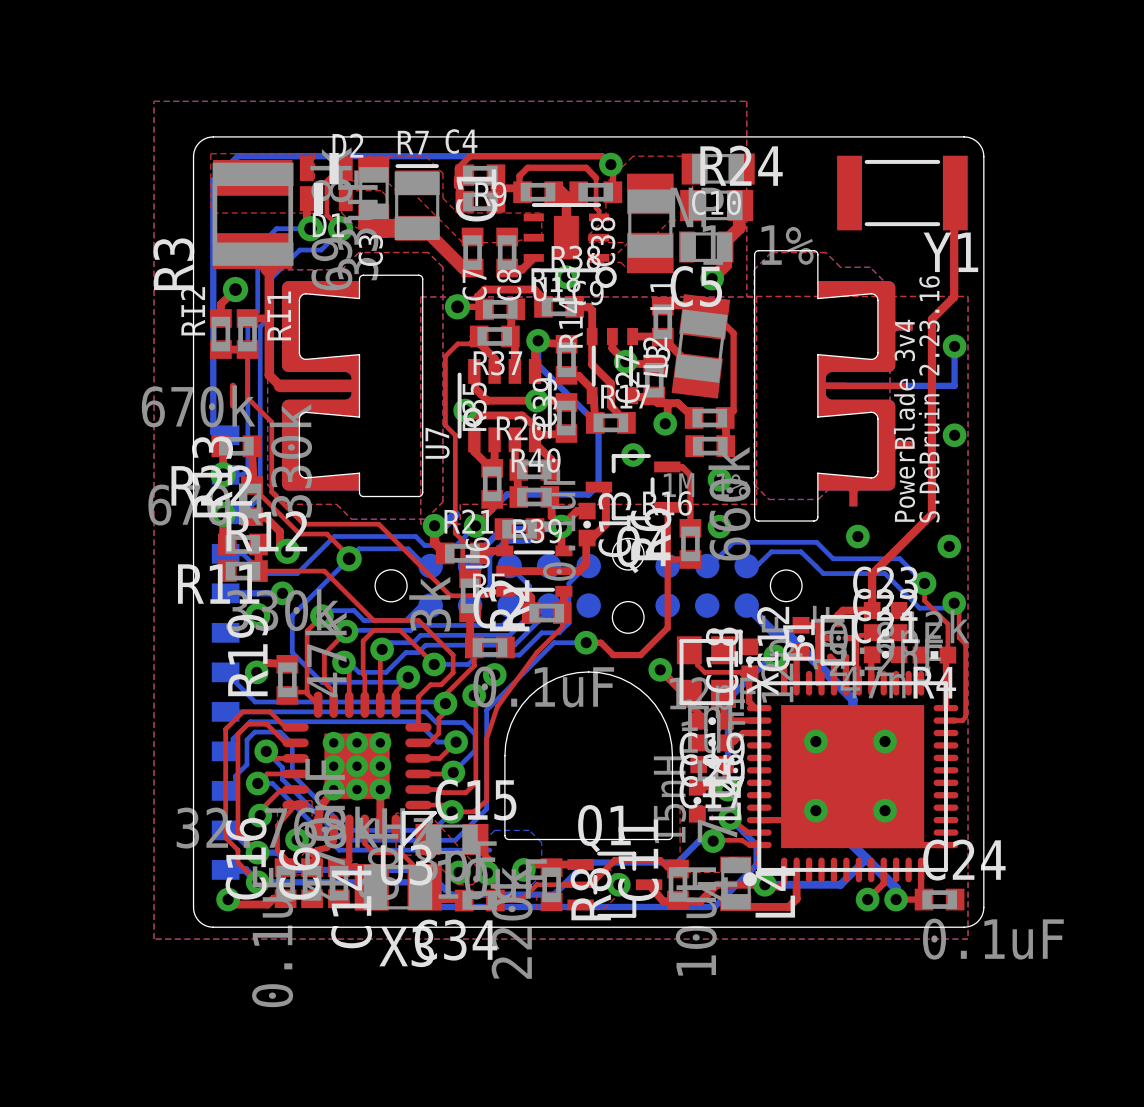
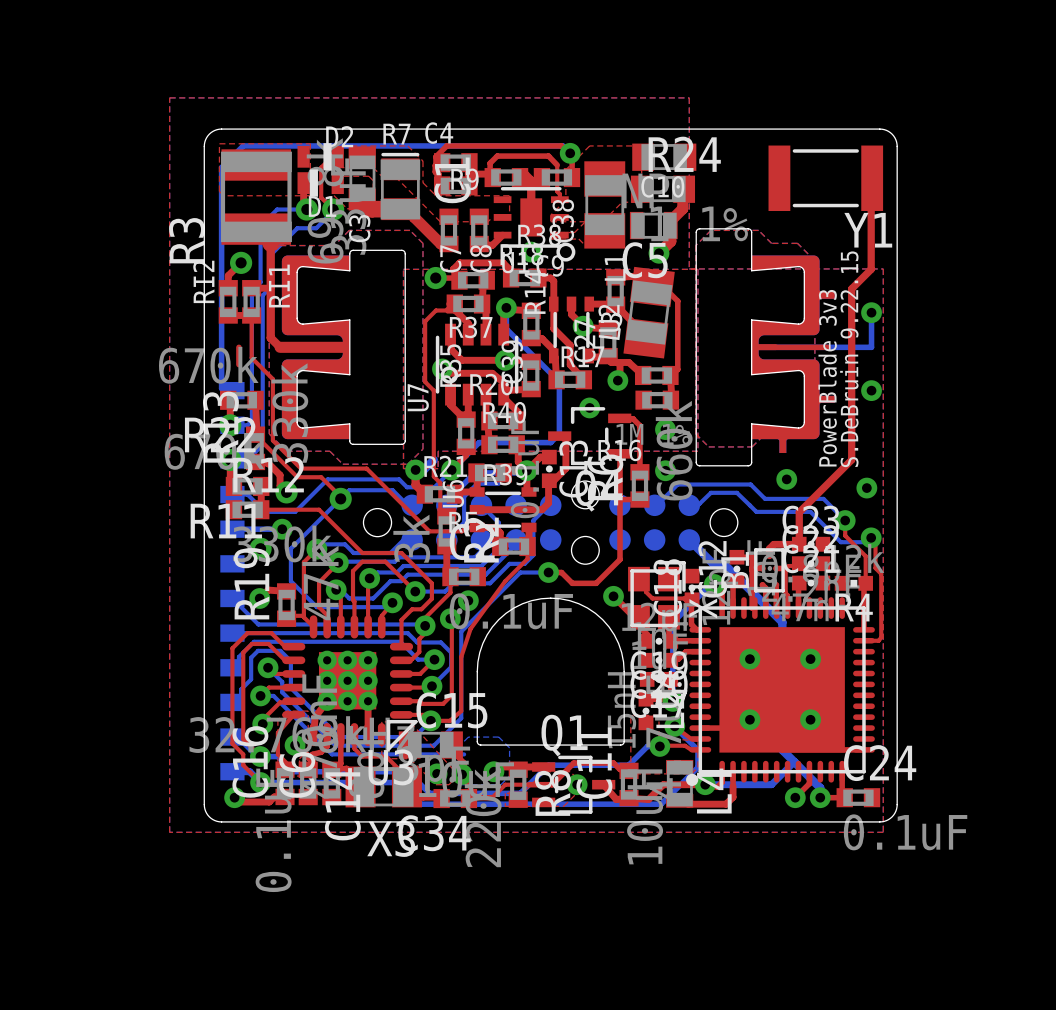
text: S.DeBruin 2.23.16 (929, 399) -> S.DeBruin 9.22.15 (849, 359)
text: PowerBlade 3v4 (904, 420) -> PowerBlade 3v3 (827, 378)

